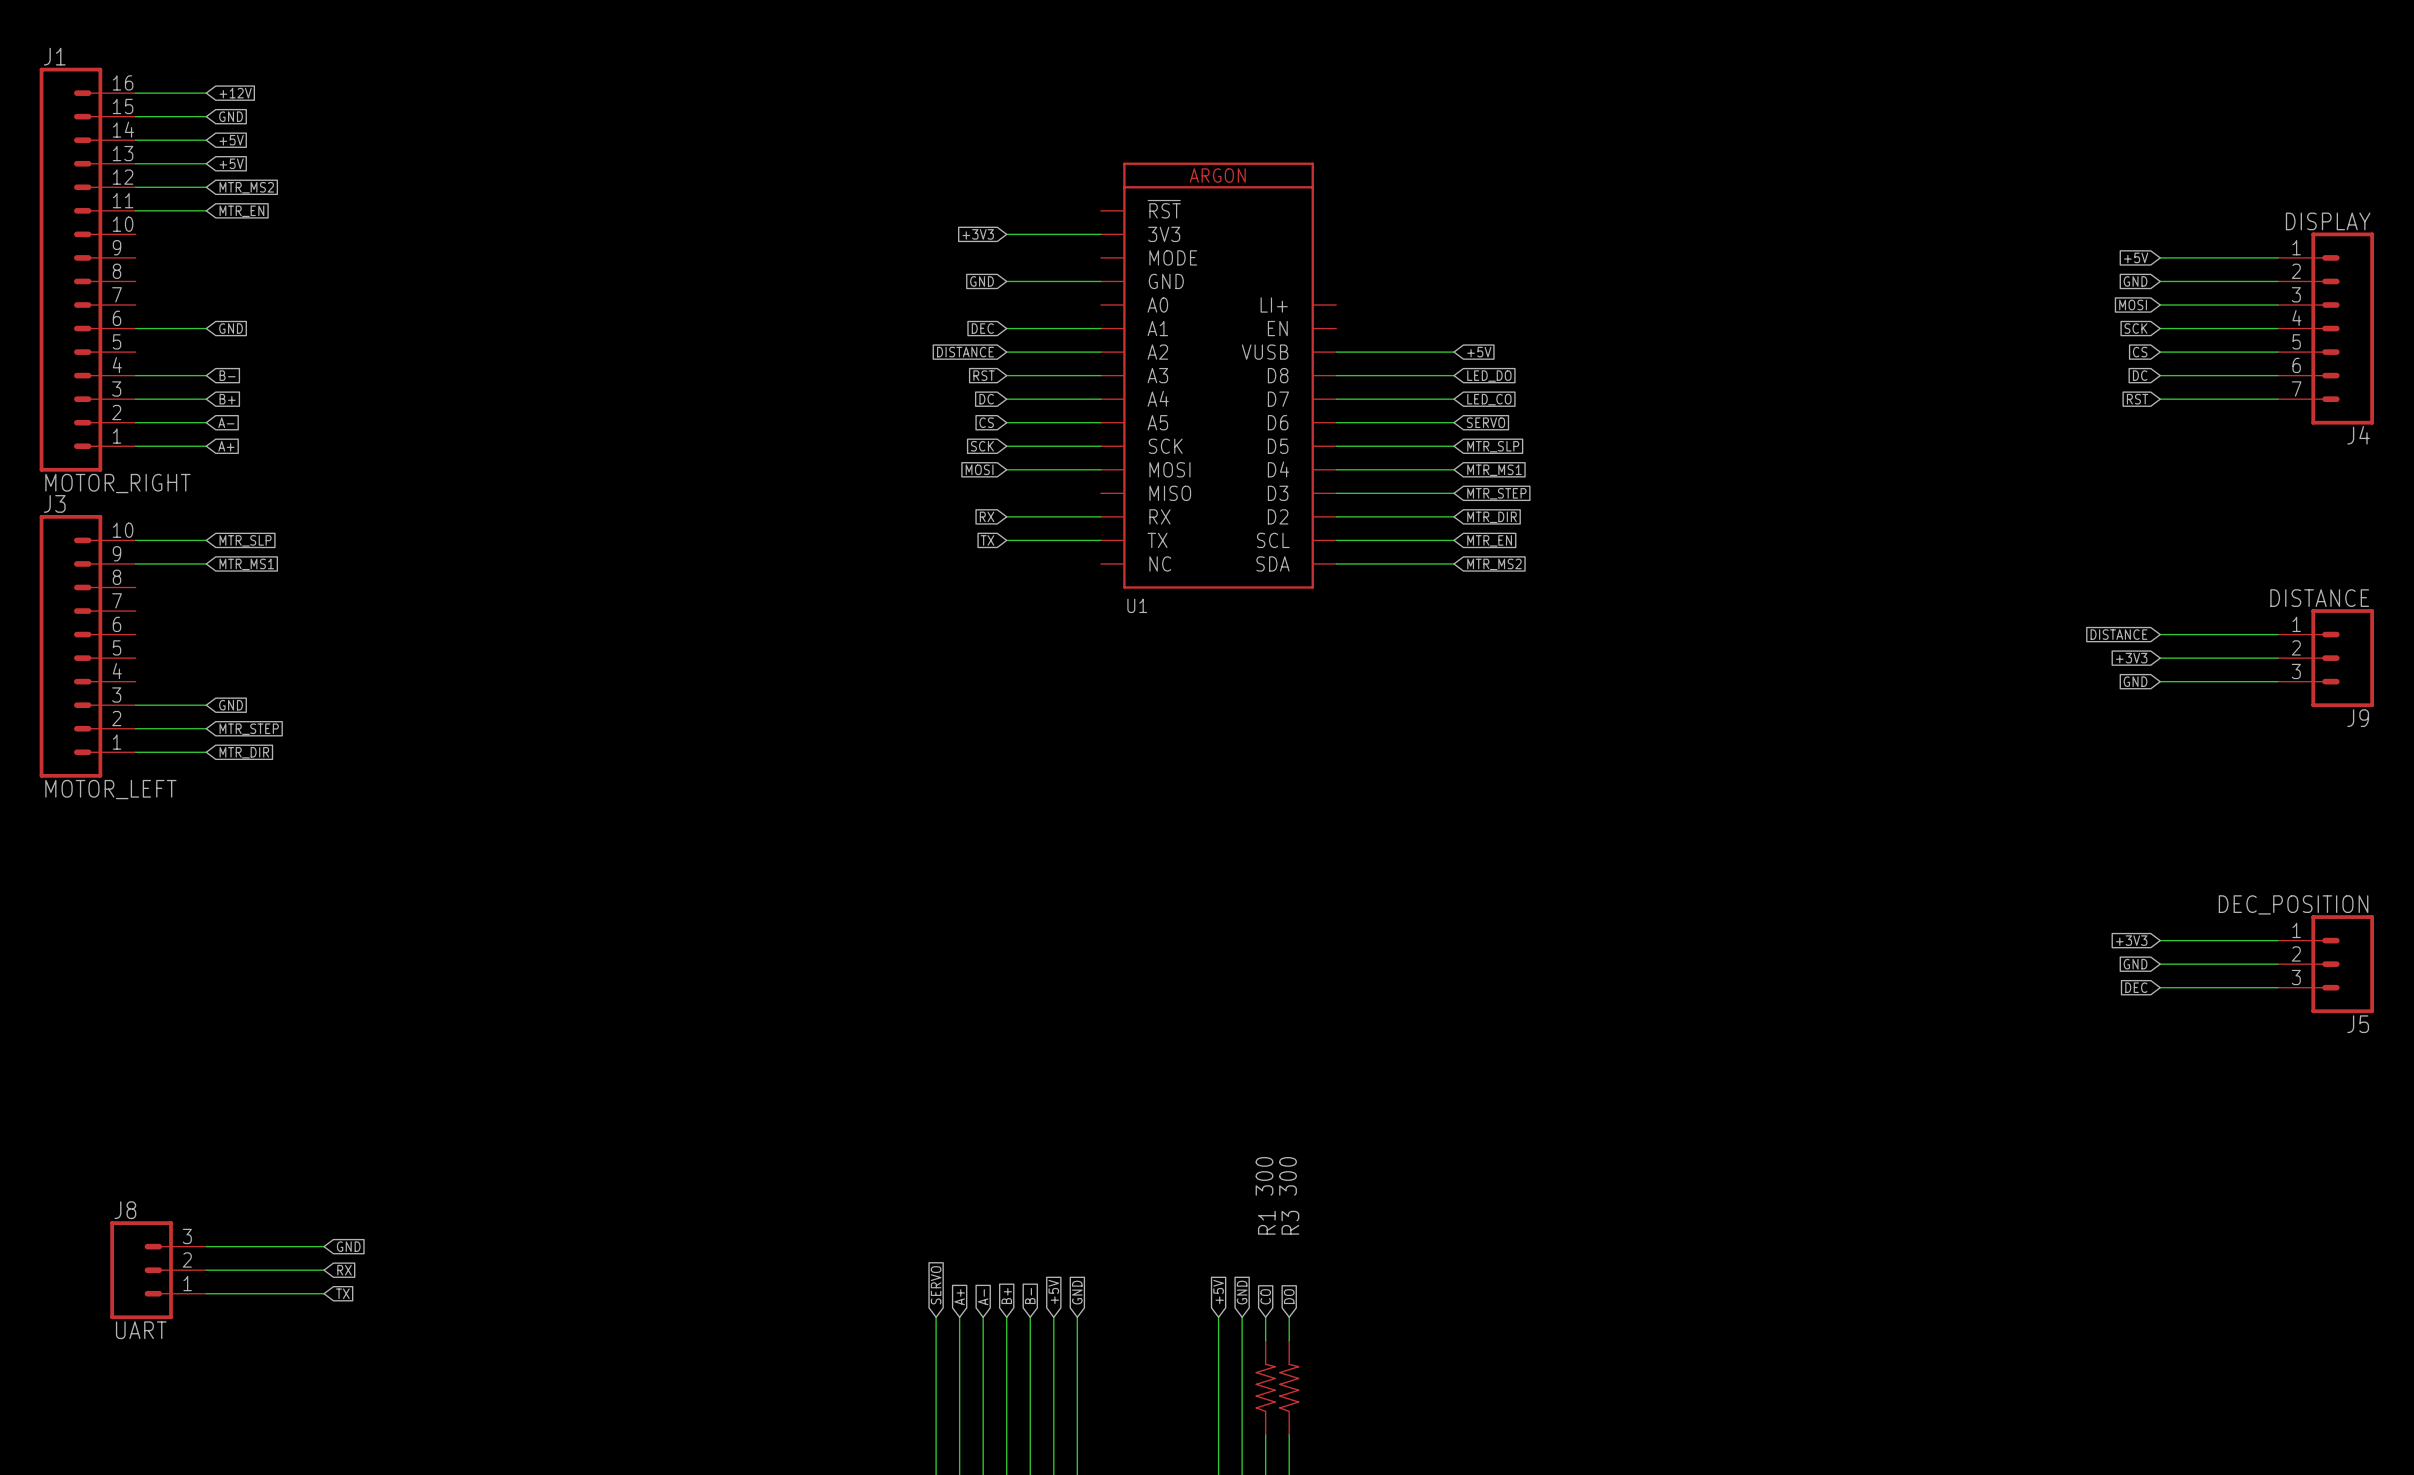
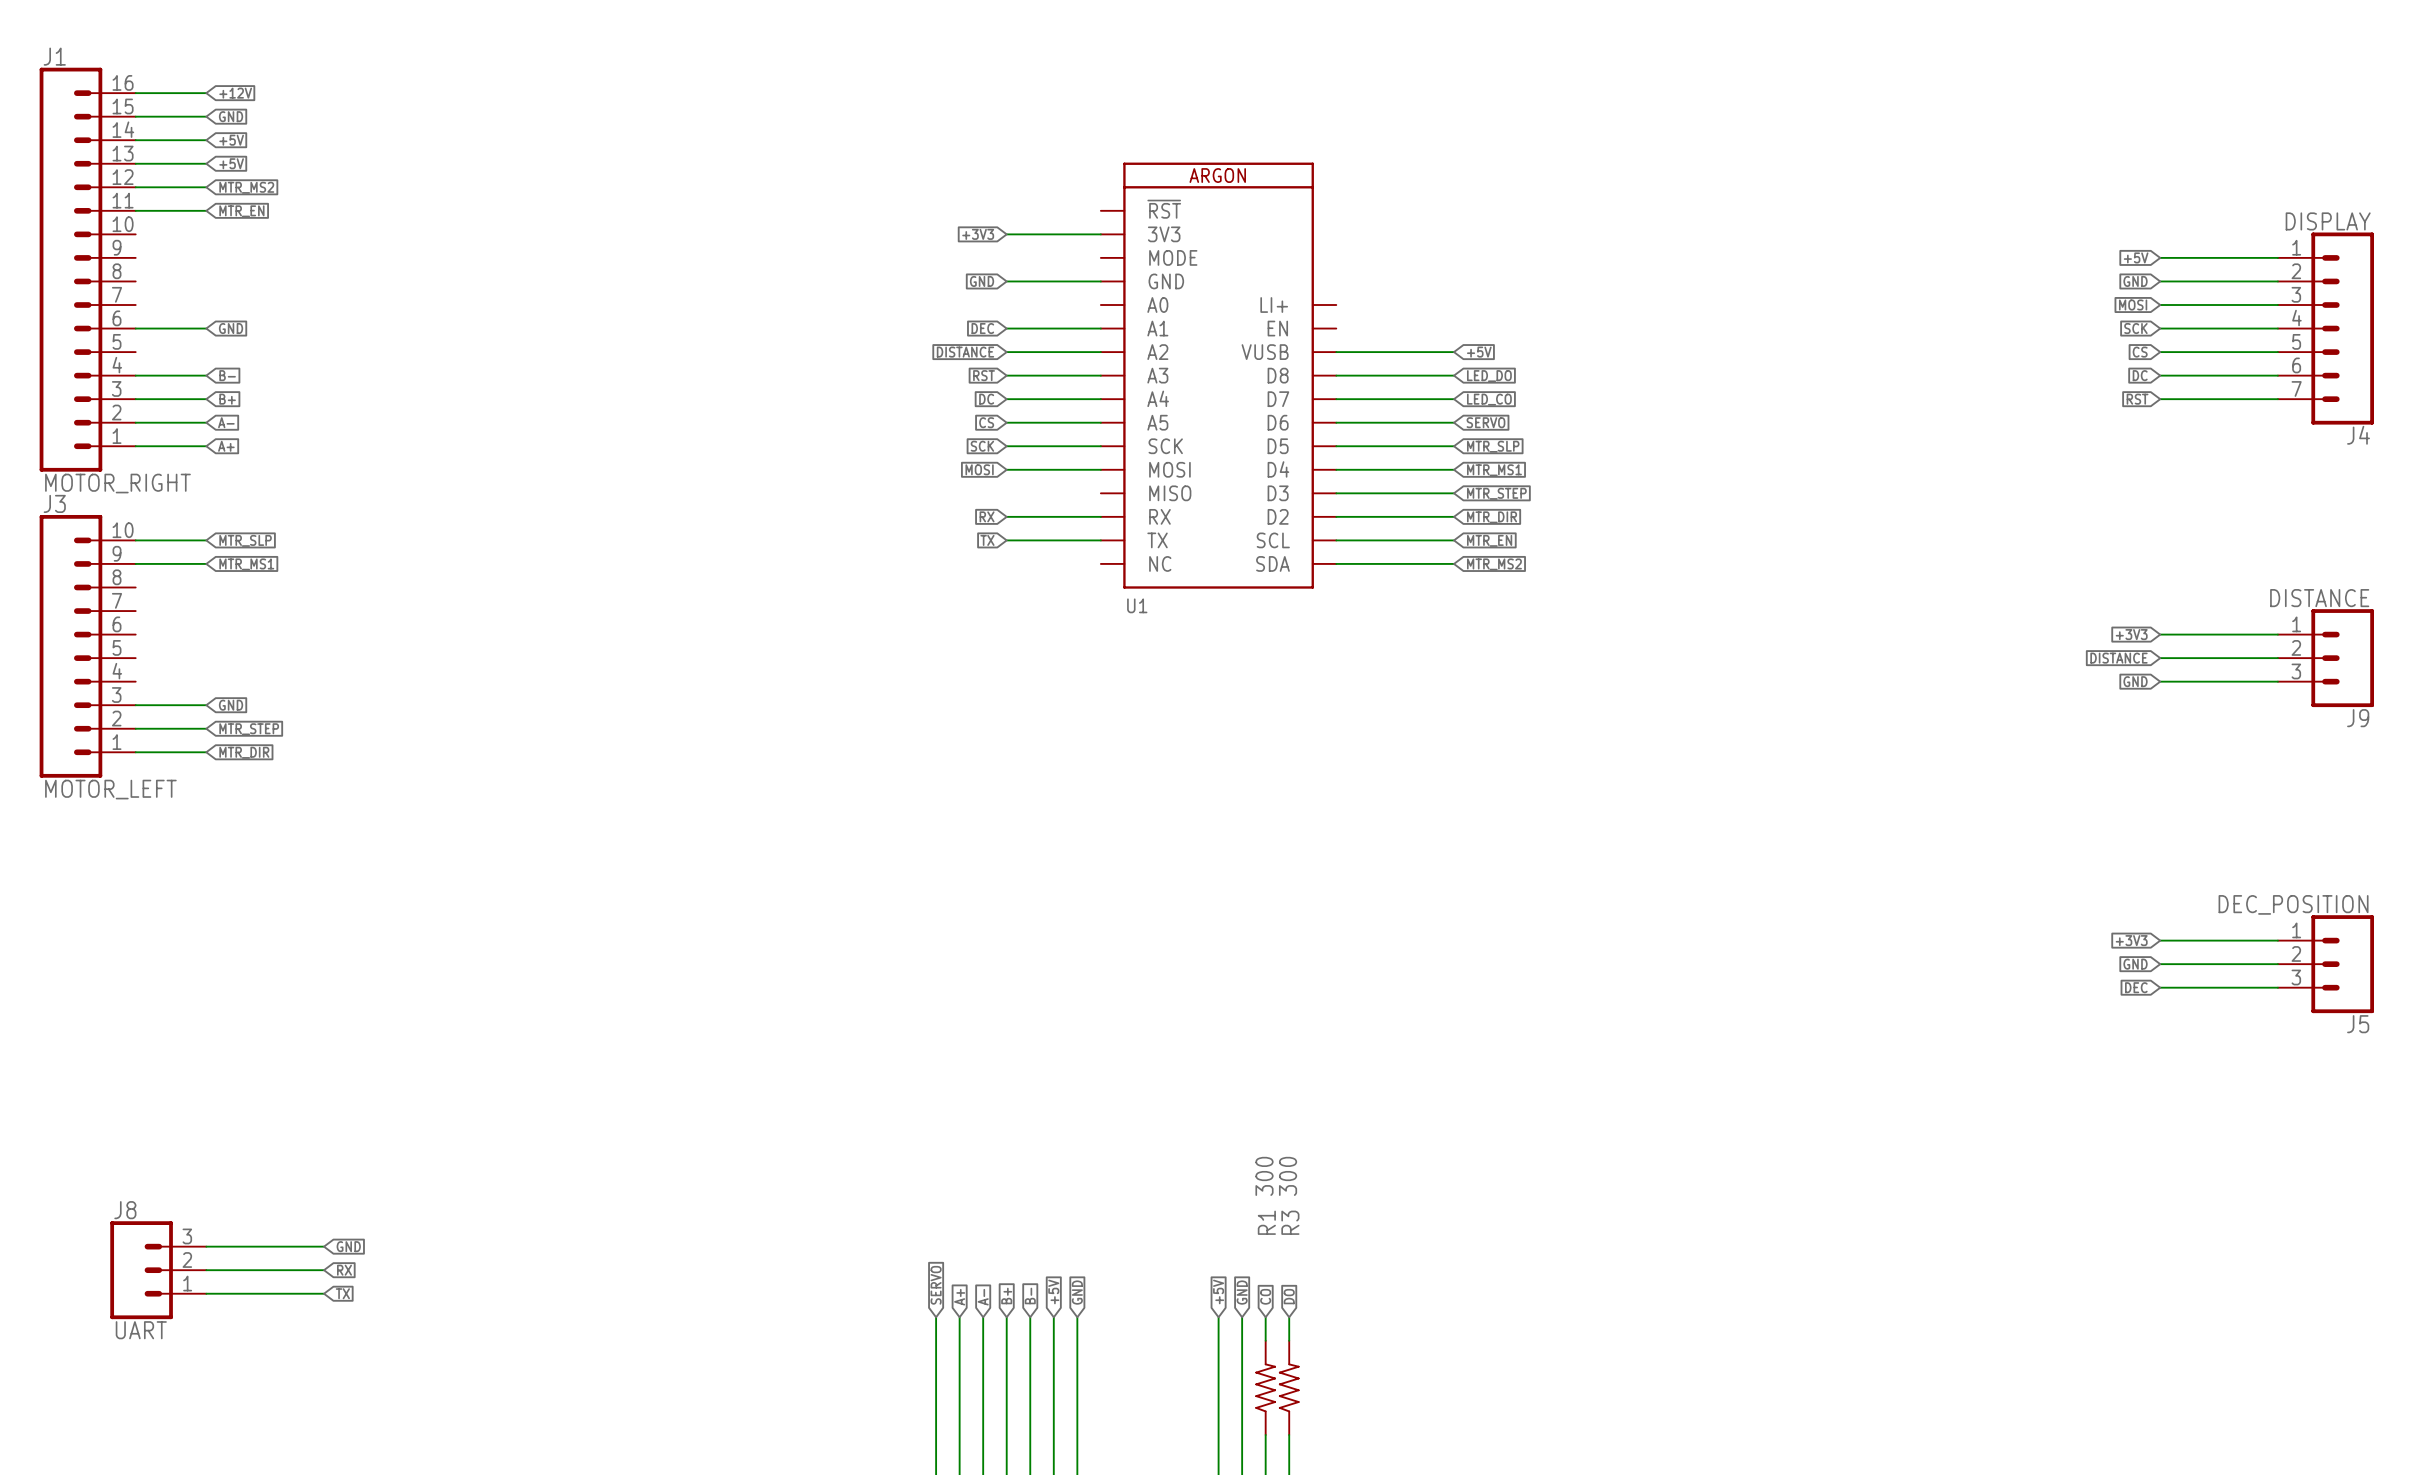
global label: DISTANCE (2118, 634) -> +3V3 (2131, 634)
global label: +3V3 (2131, 658) -> DISTANCE (2118, 658)

